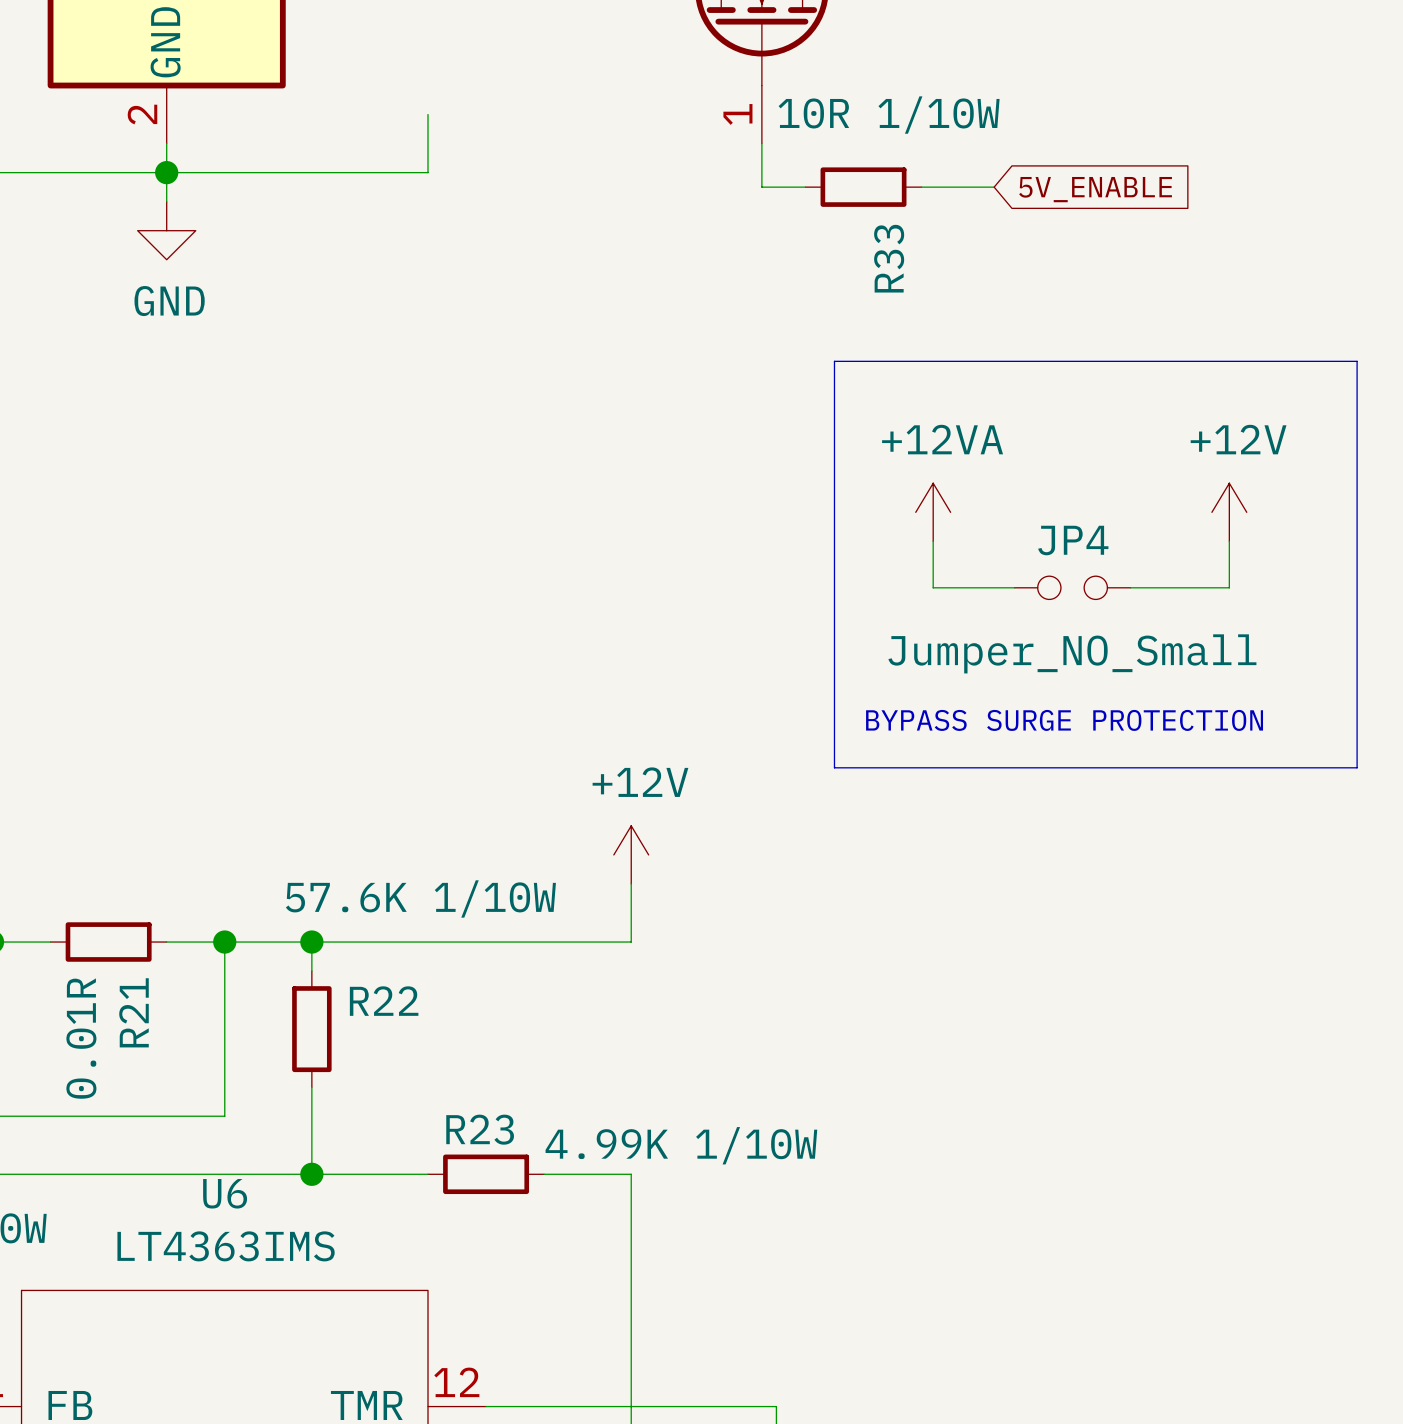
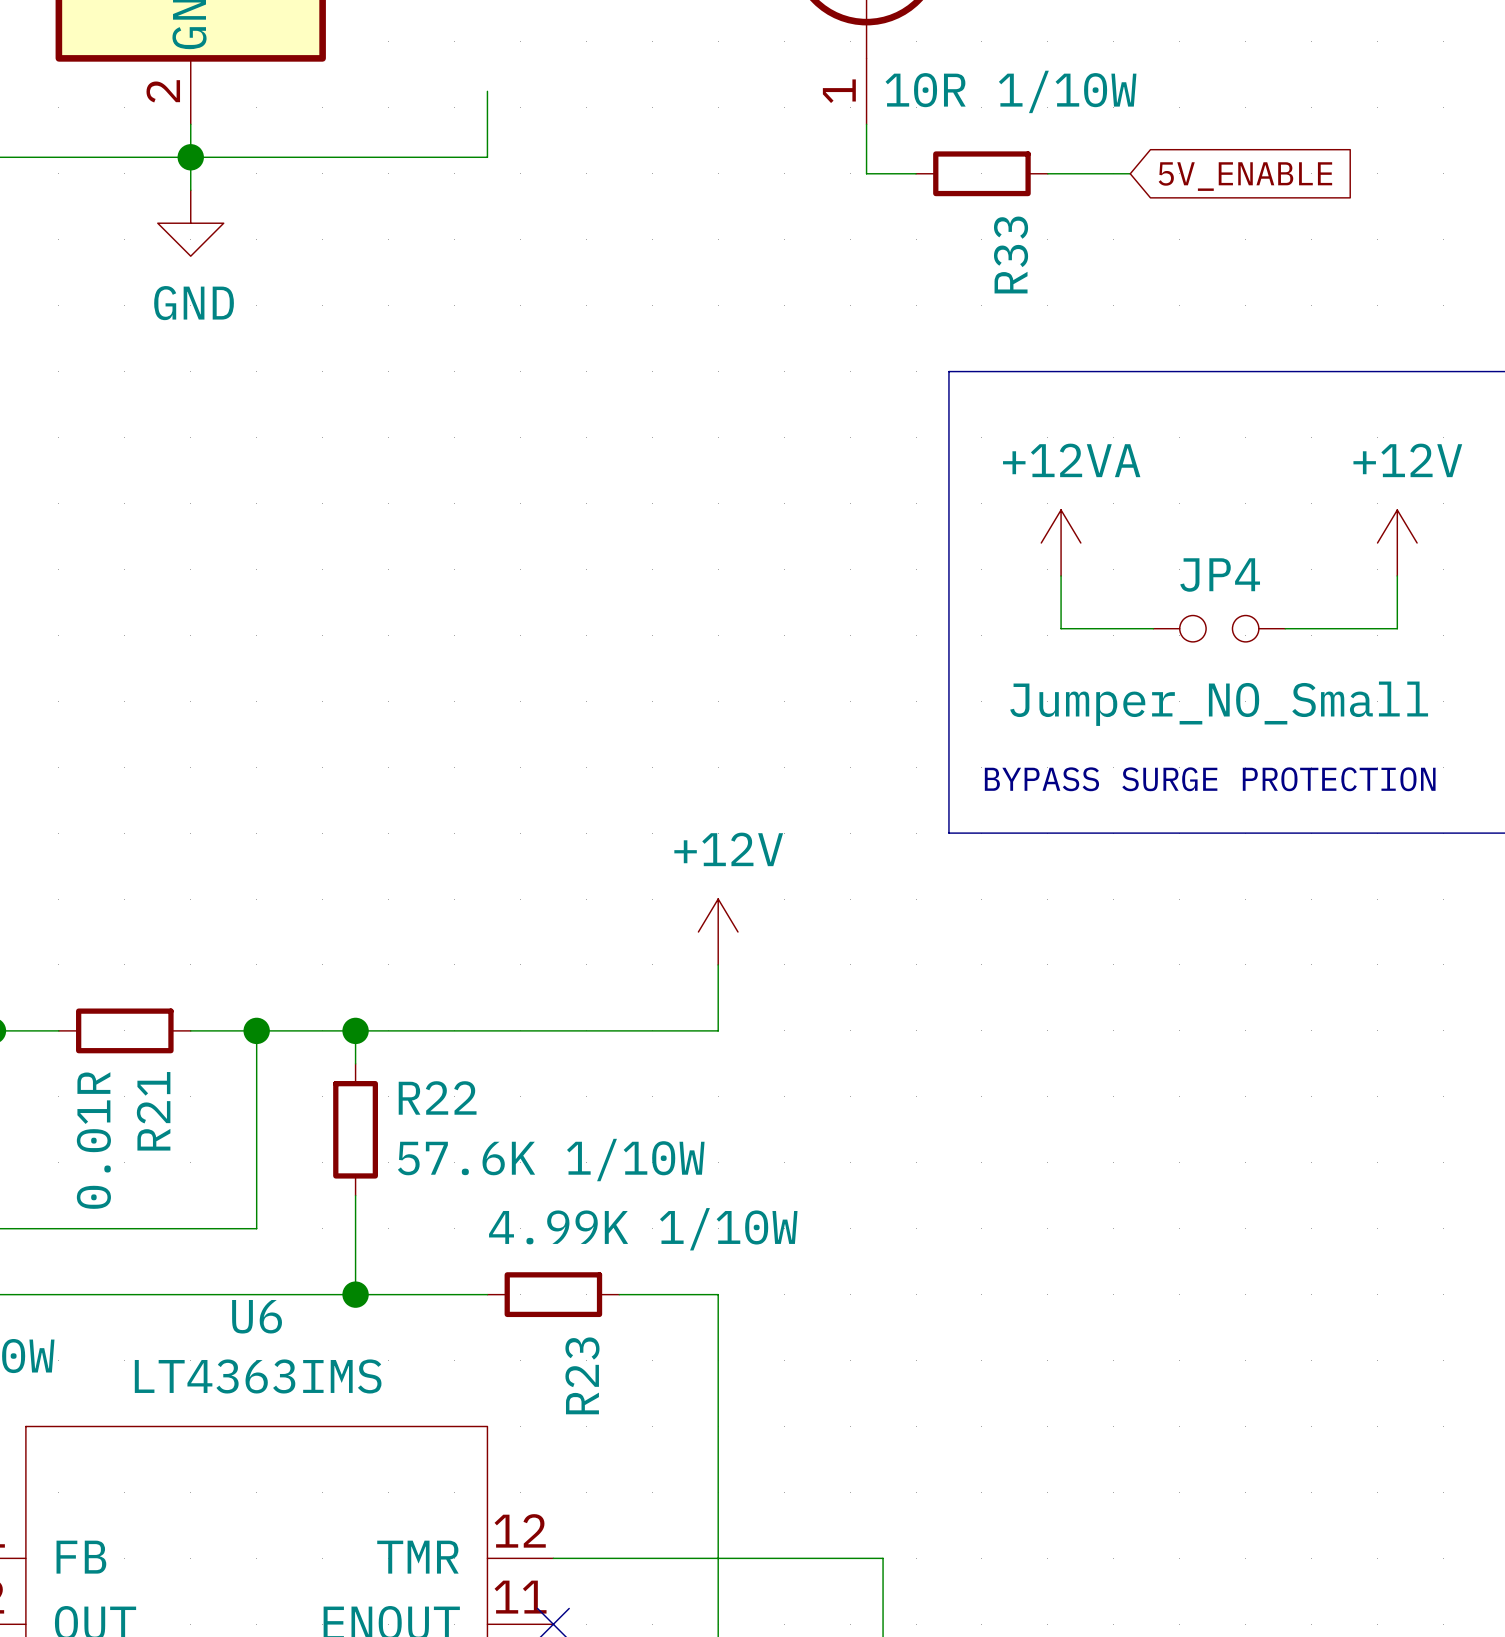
R22 value position: 57.6K 1/10W (420, 898) -> 57.6K 1/10W (551, 1160)
R23 name rotation: 0° (480, 1129) -> 90° counterclockwise (582, 1375)
R23 name position: R23 (480, 1129) -> R23 (582, 1375)
R23 value position: 4.99K 1/10W (681, 1145) -> 4.99K 1/10W (643, 1229)

